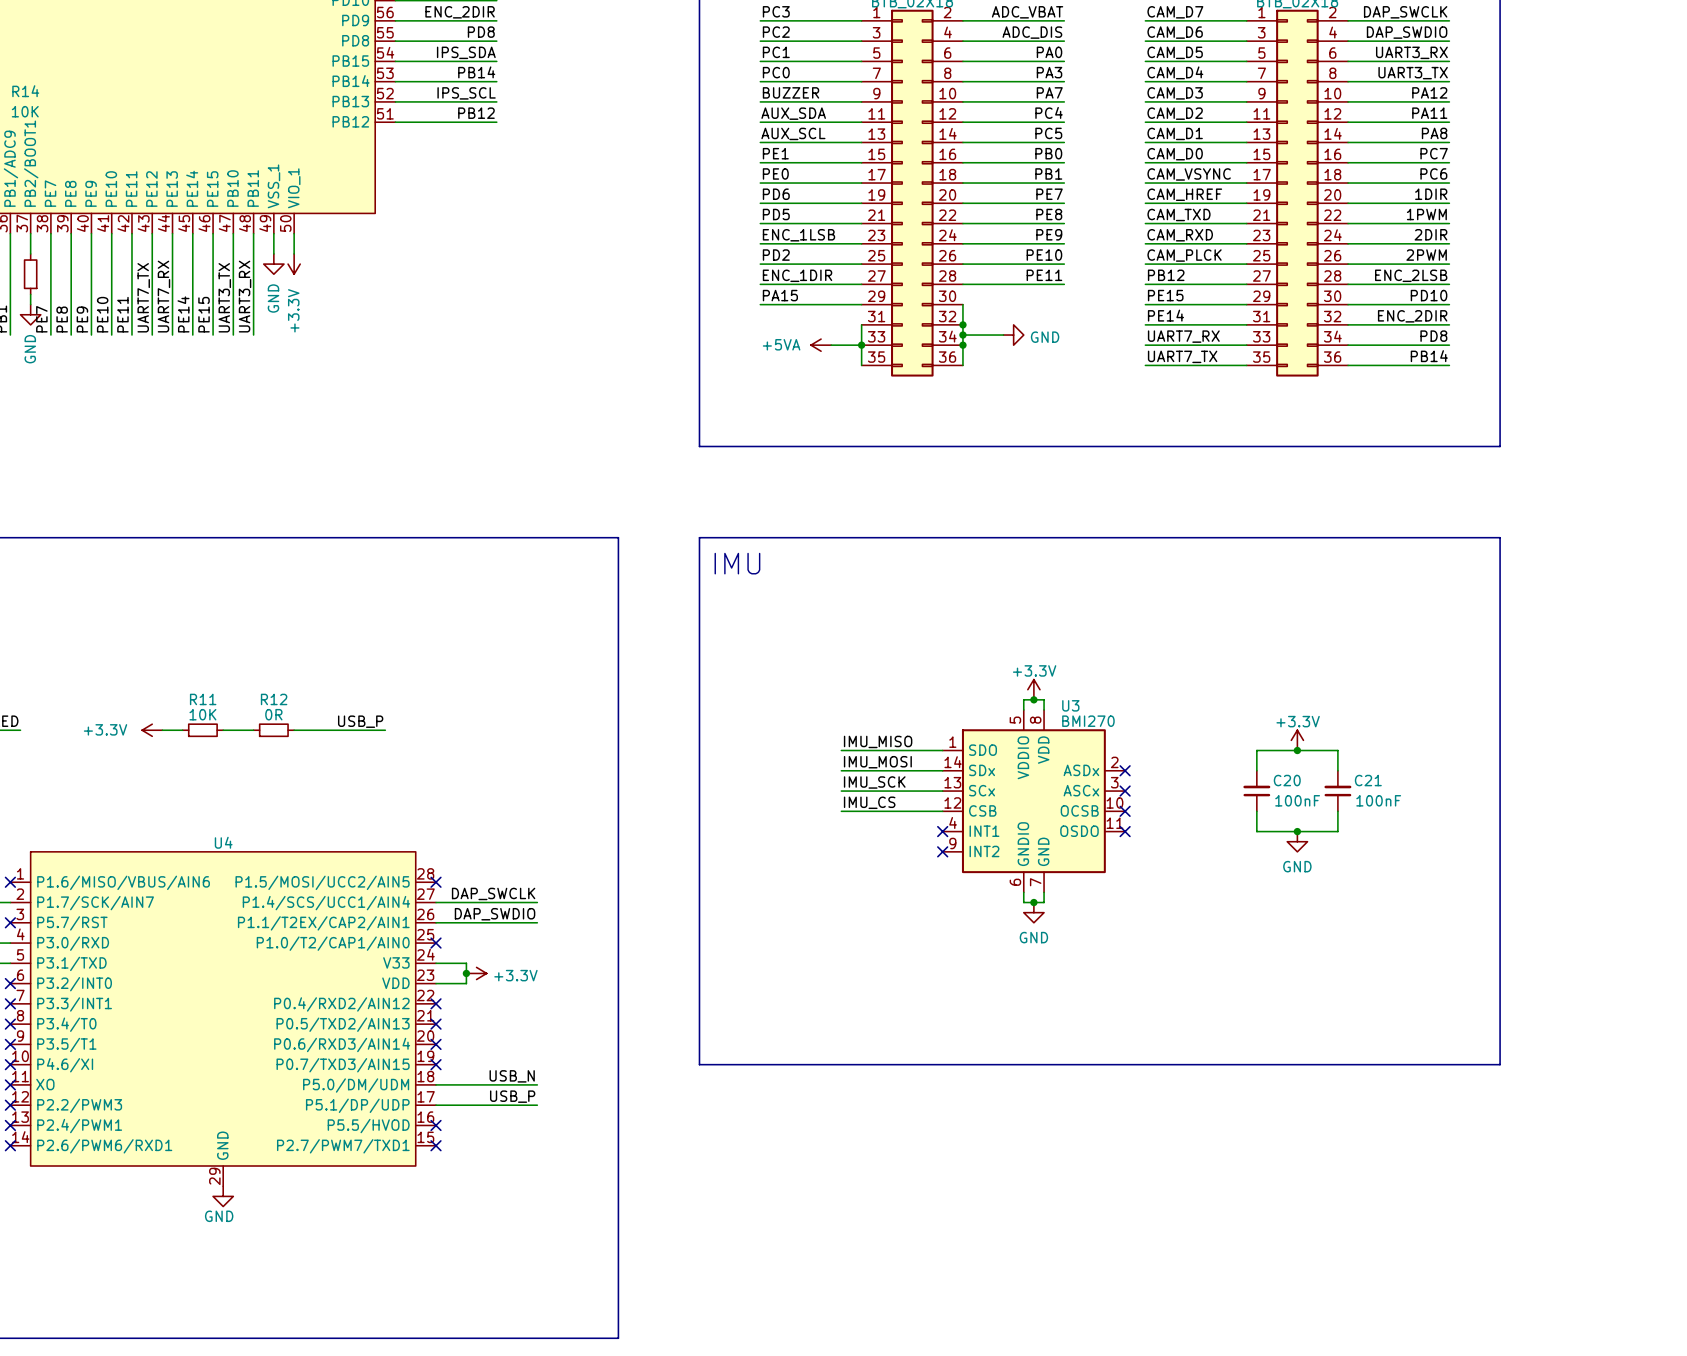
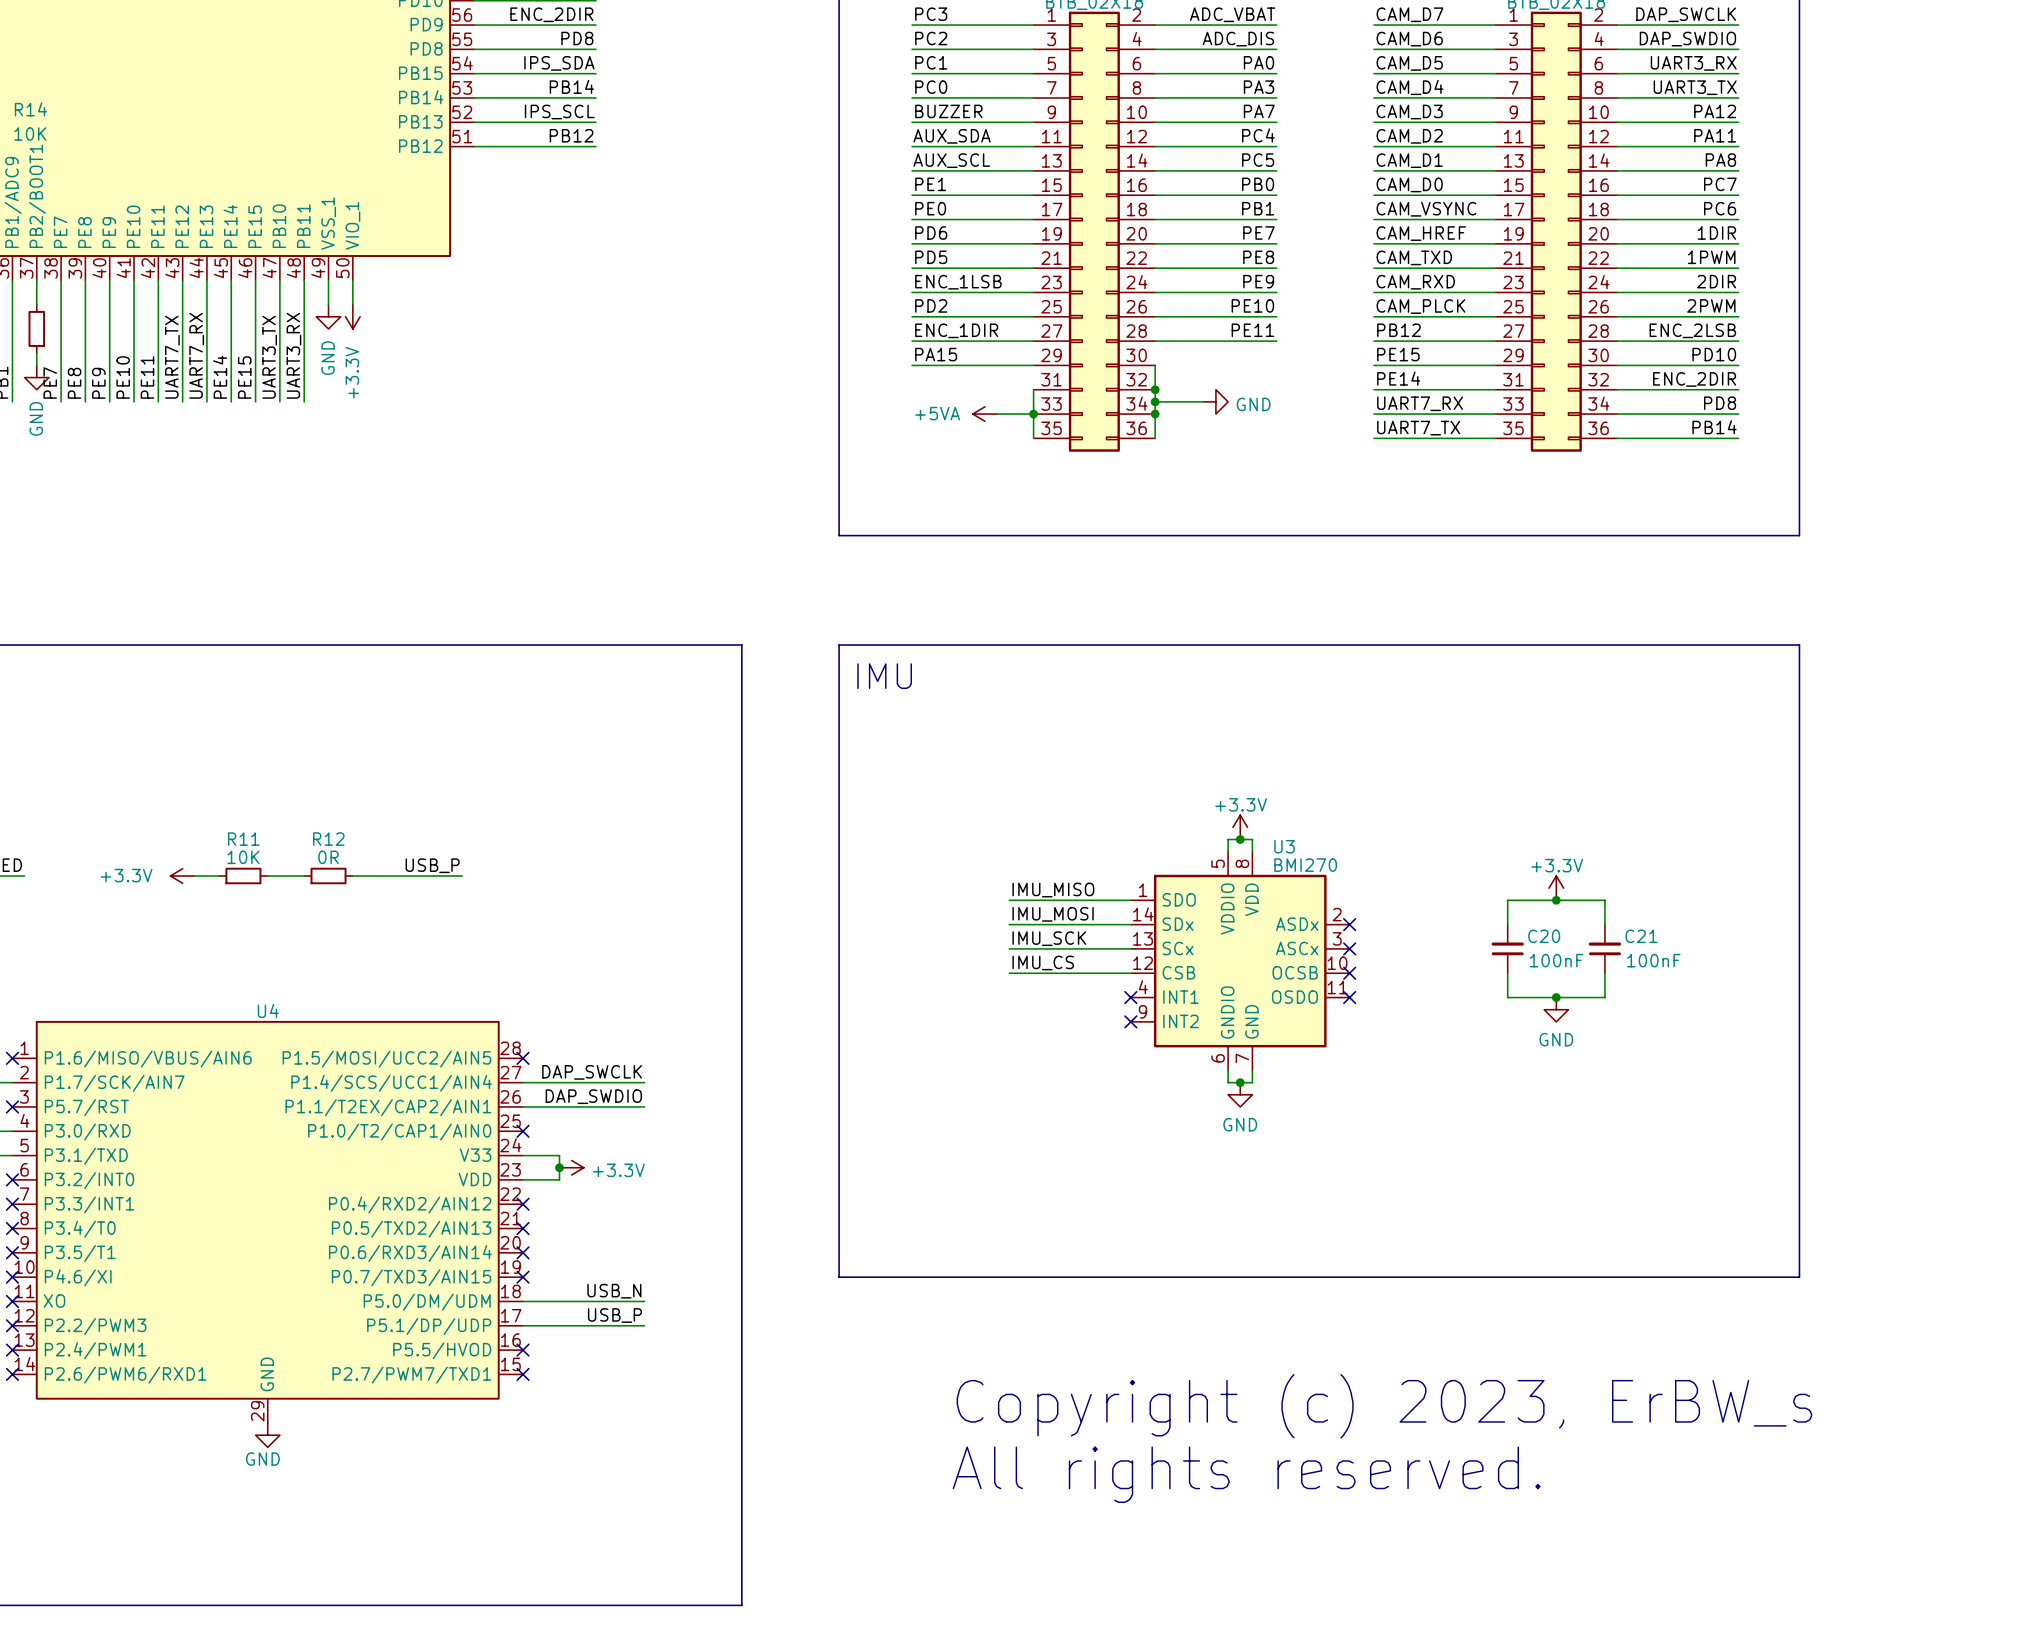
text: none -> Copyright (c) 2023, ErBW_s (1384, 1406)
text: none -> All rights reserved. (1246, 1474)

